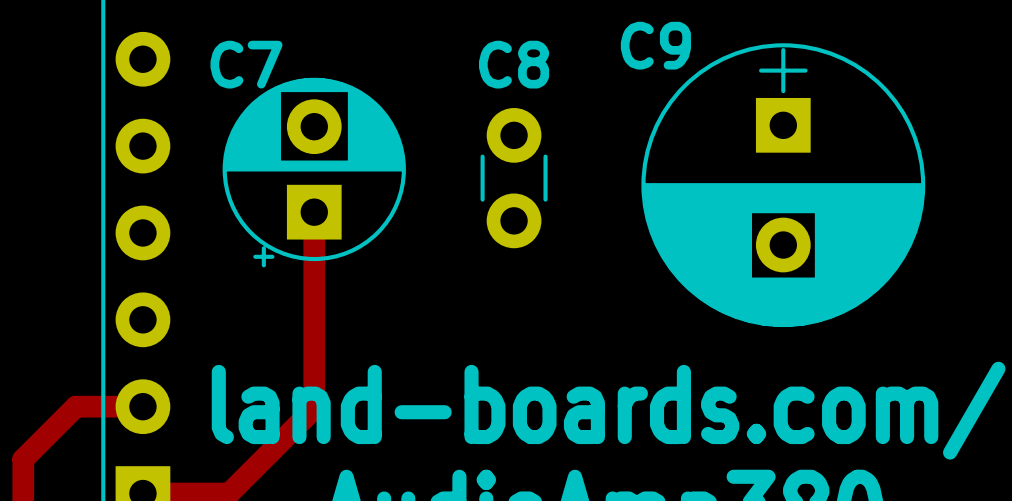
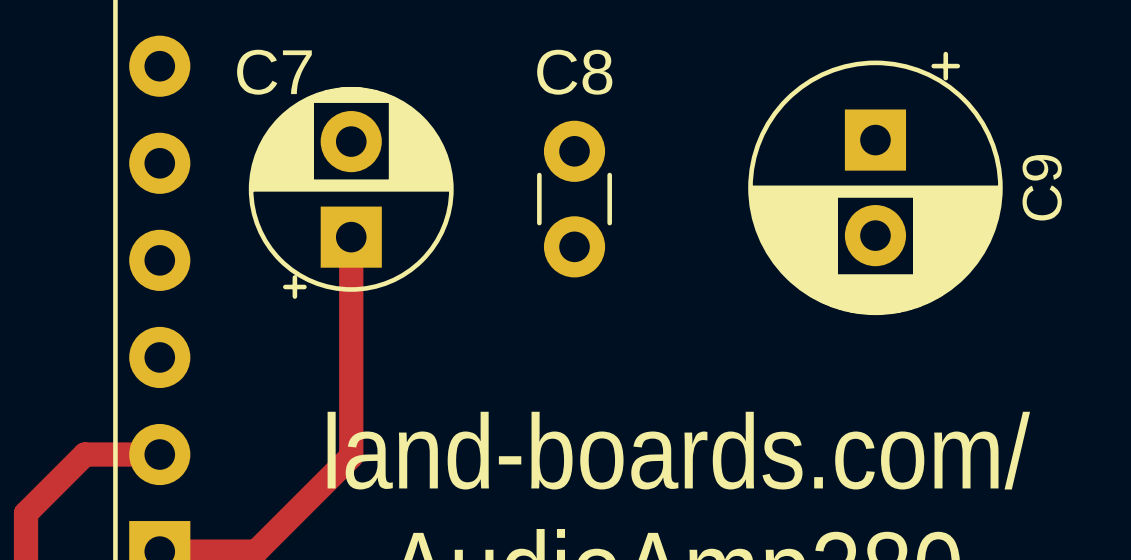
C9 footprint: [641, 43, 926, 328] -> [748, 51, 1003, 316]
C9 name position: C9 (655, 45) -> C9 (1042, 187)

